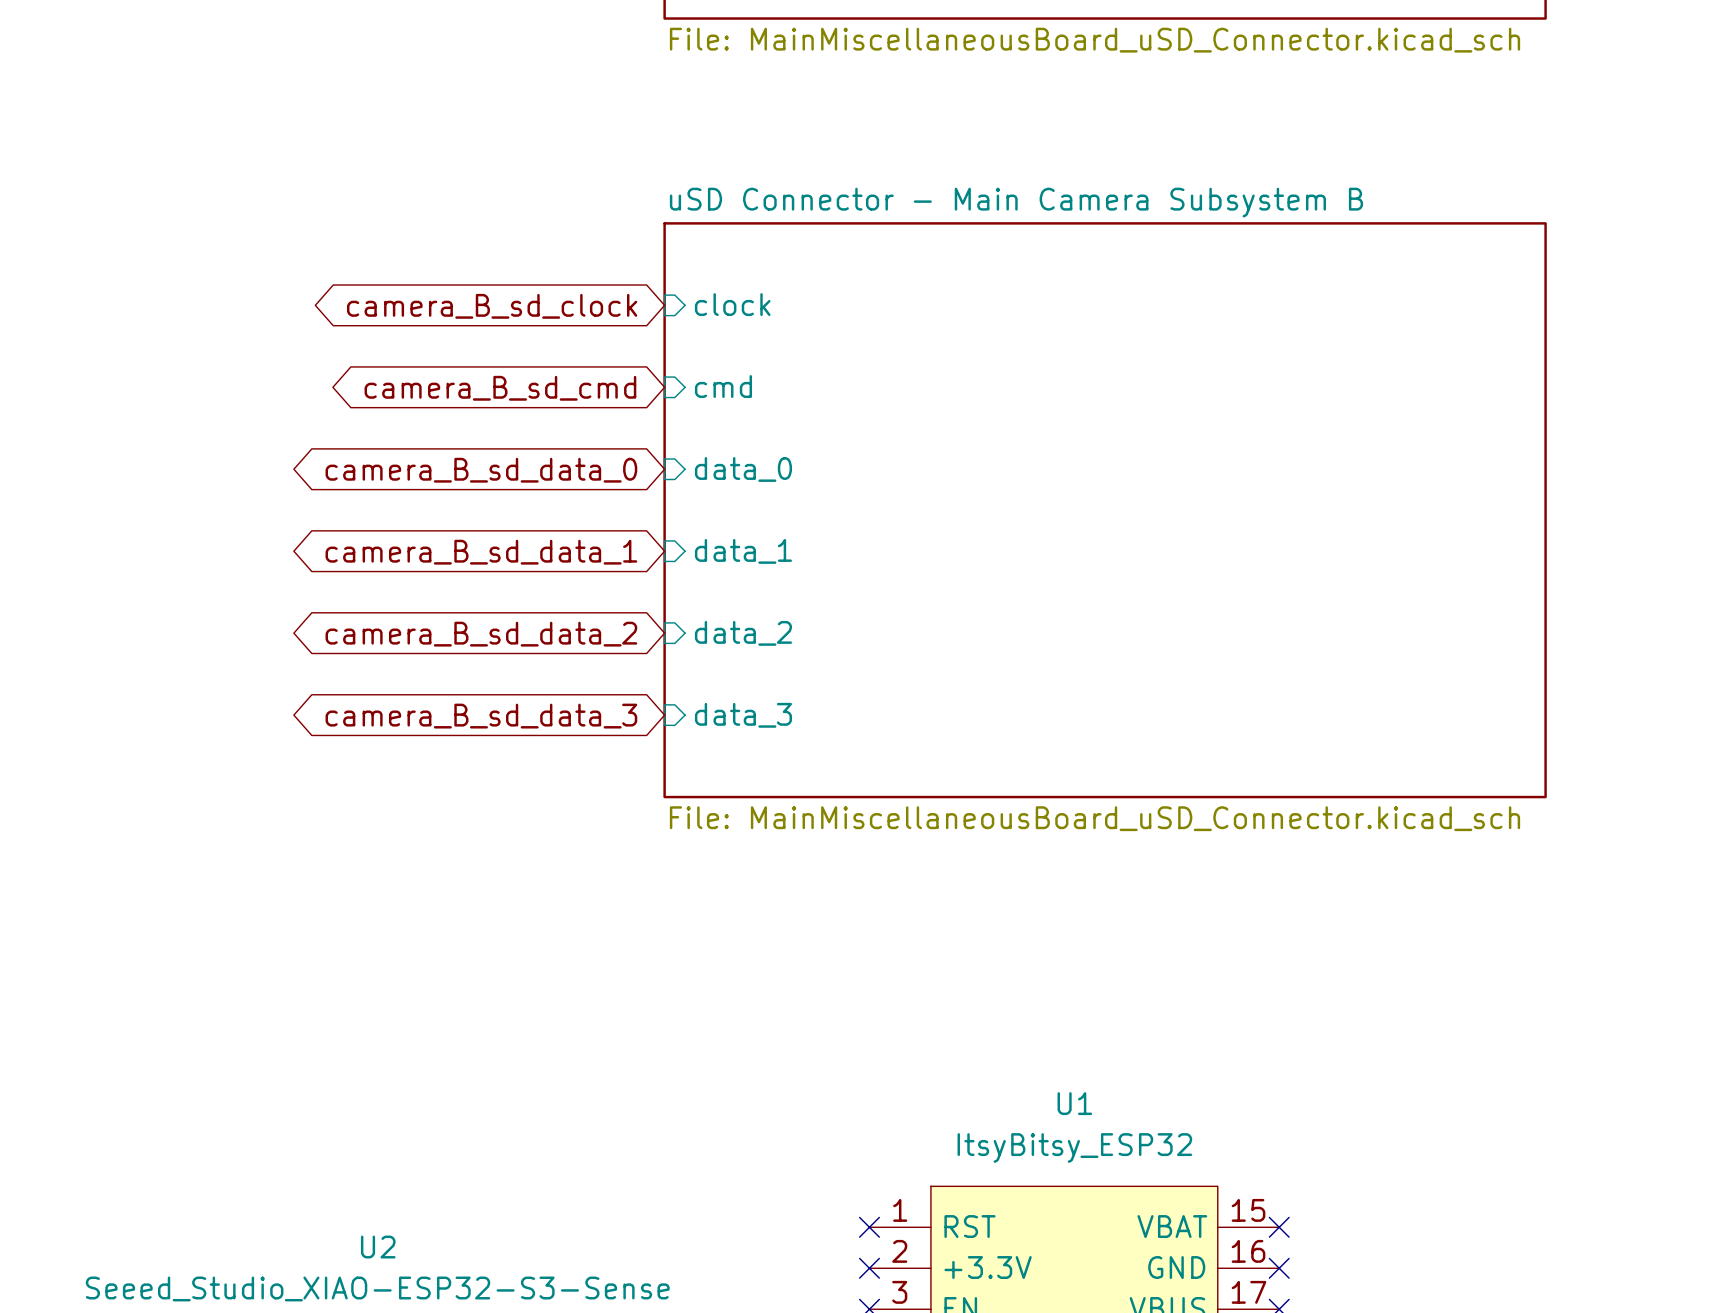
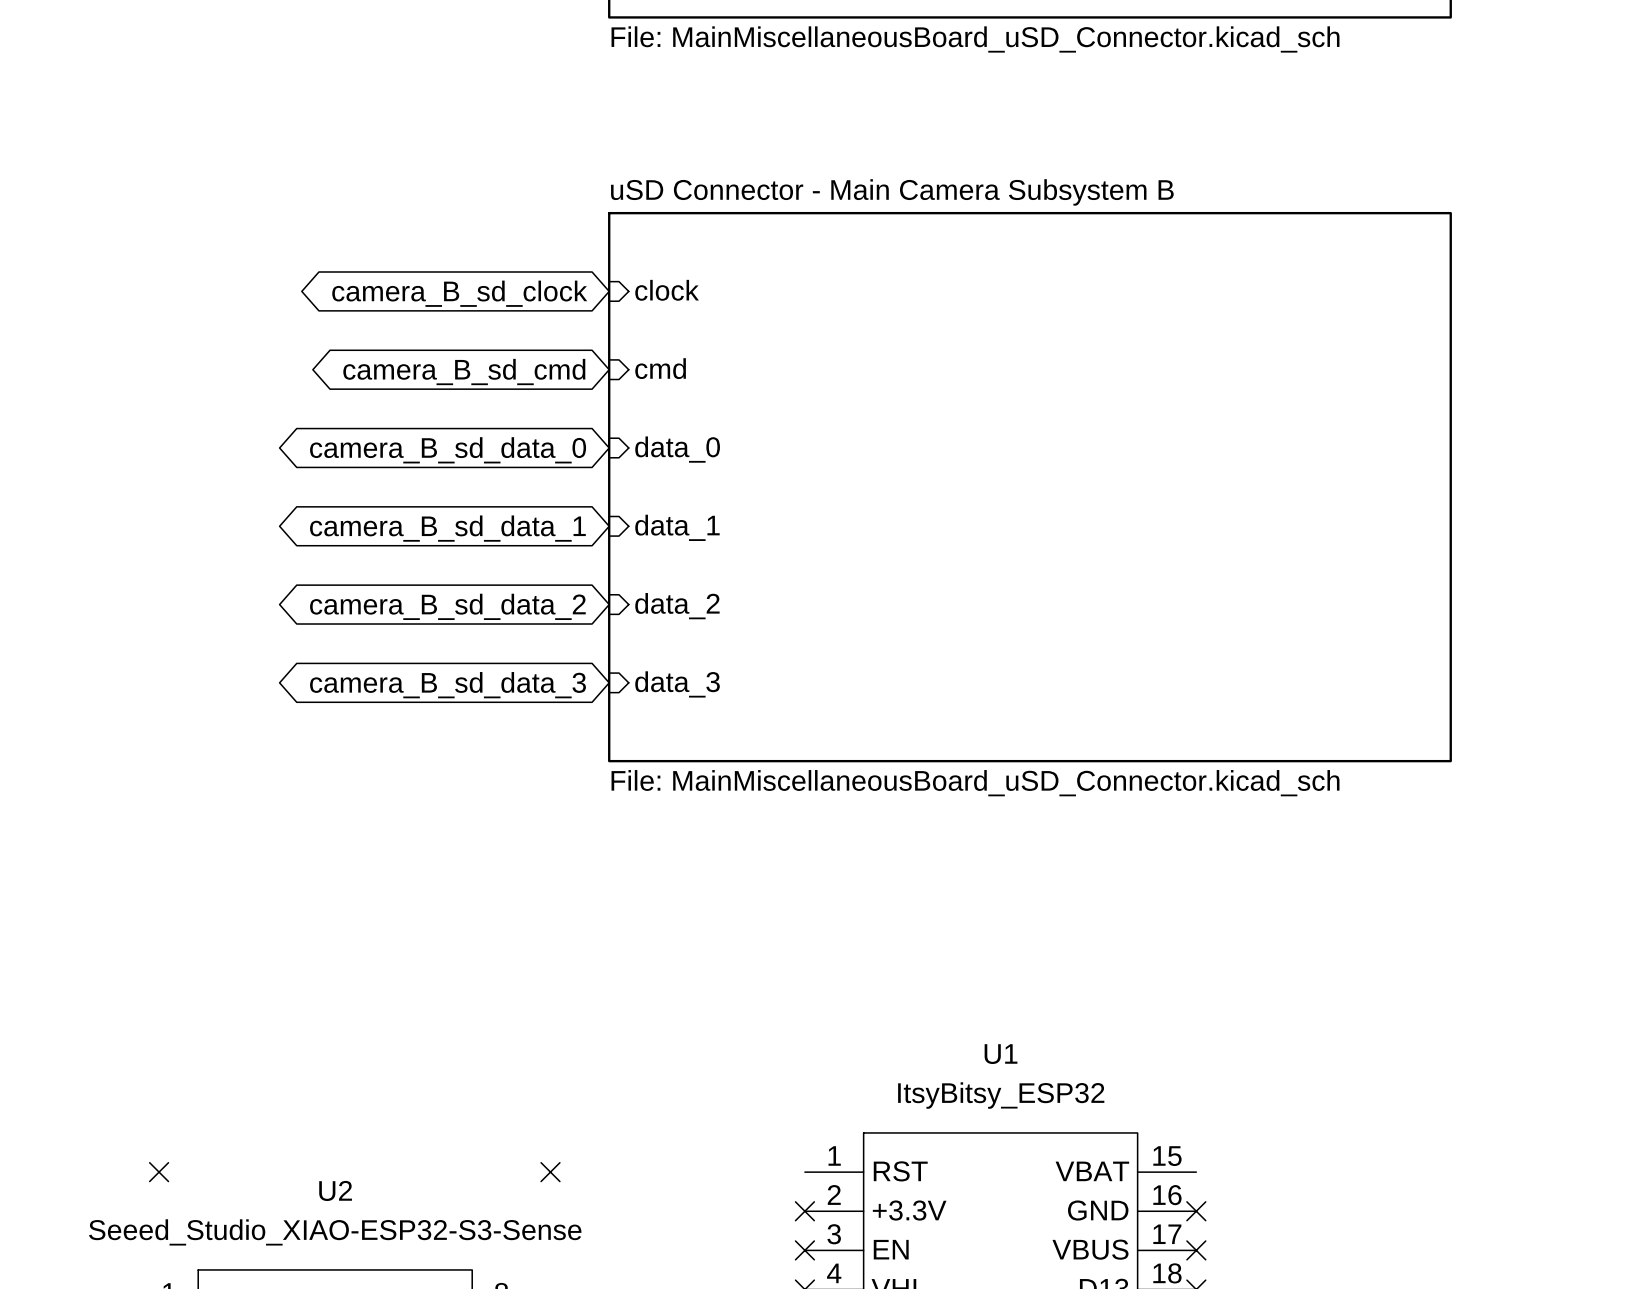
no-connect mark: none -> (159, 1172)
no-connect mark: none -> (550, 1172)
no-connect mark: (869, 1227) -> none
no-connect mark: (1279, 1227) -> none

